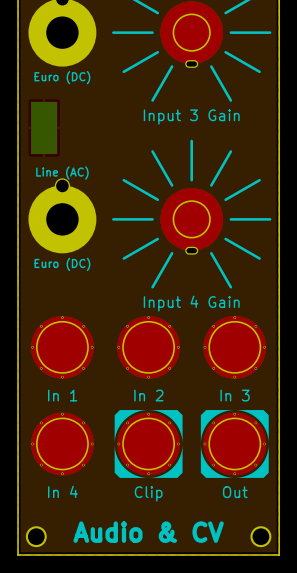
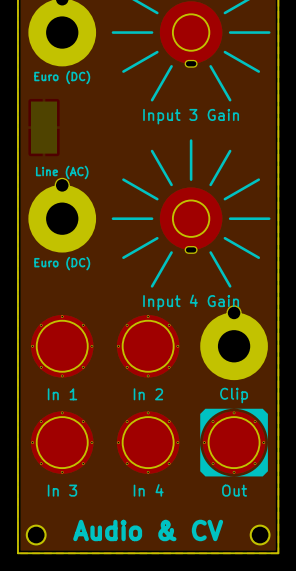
part footprint: [203, 316, 267, 379] -> [200, 305, 268, 381]
part value: In 3 (235, 395) -> Clip (234, 395)
part footprint: [114, 410, 183, 478] -> [116, 411, 180, 474]
part value: In 4 (62, 491) -> In 3 (62, 490)
part value: Clip (148, 493) -> In 4 (148, 490)

